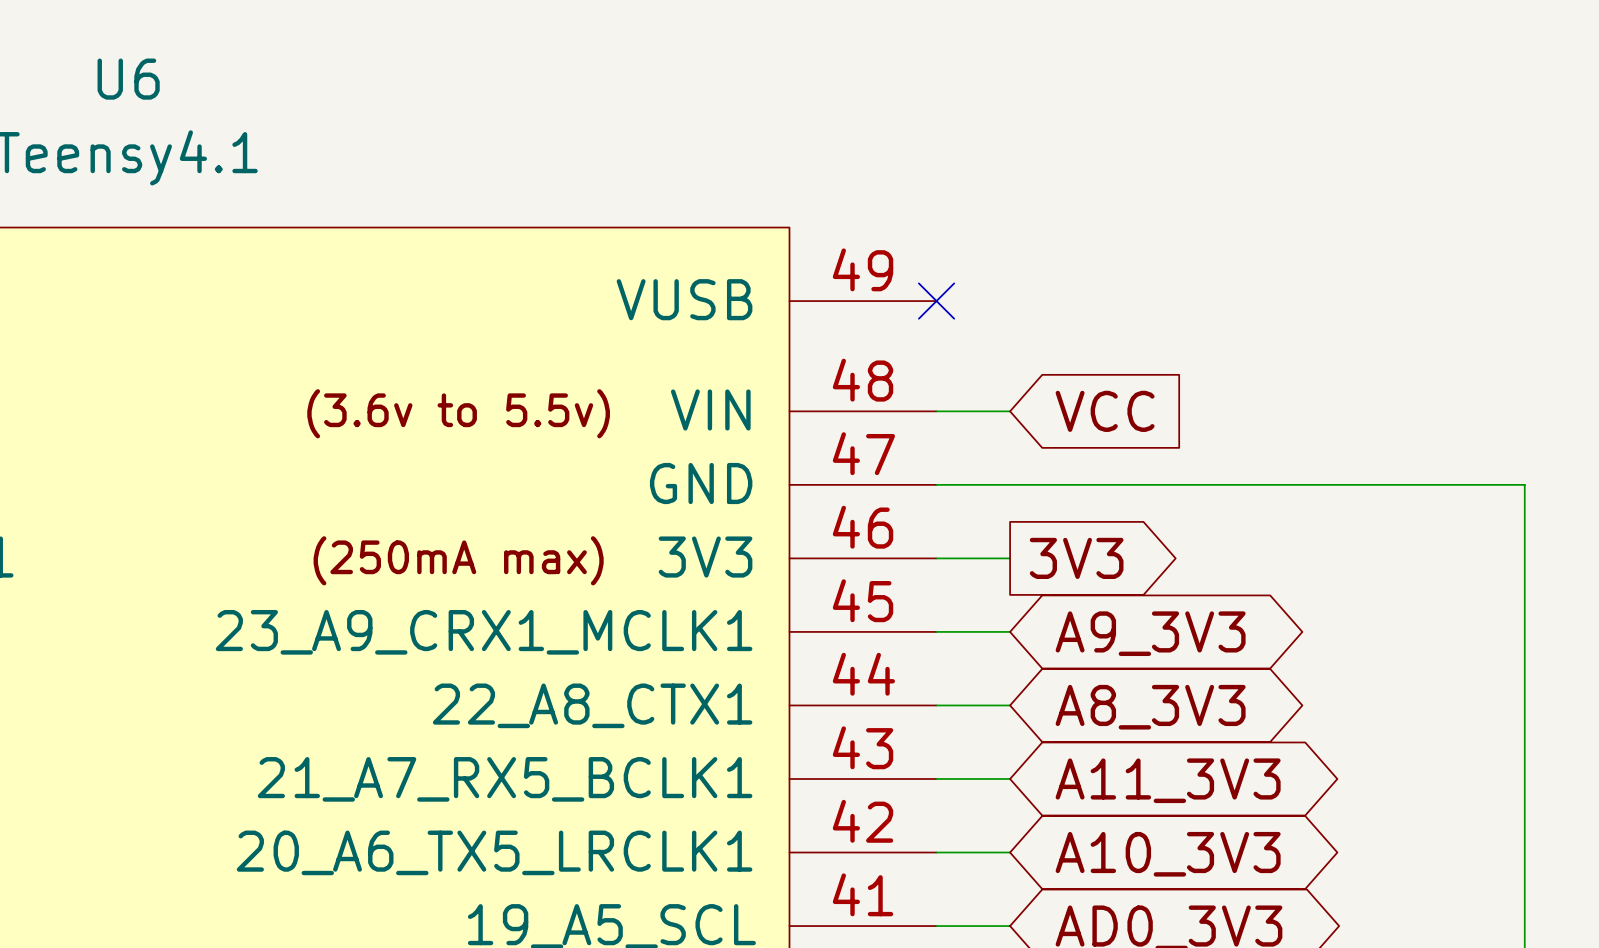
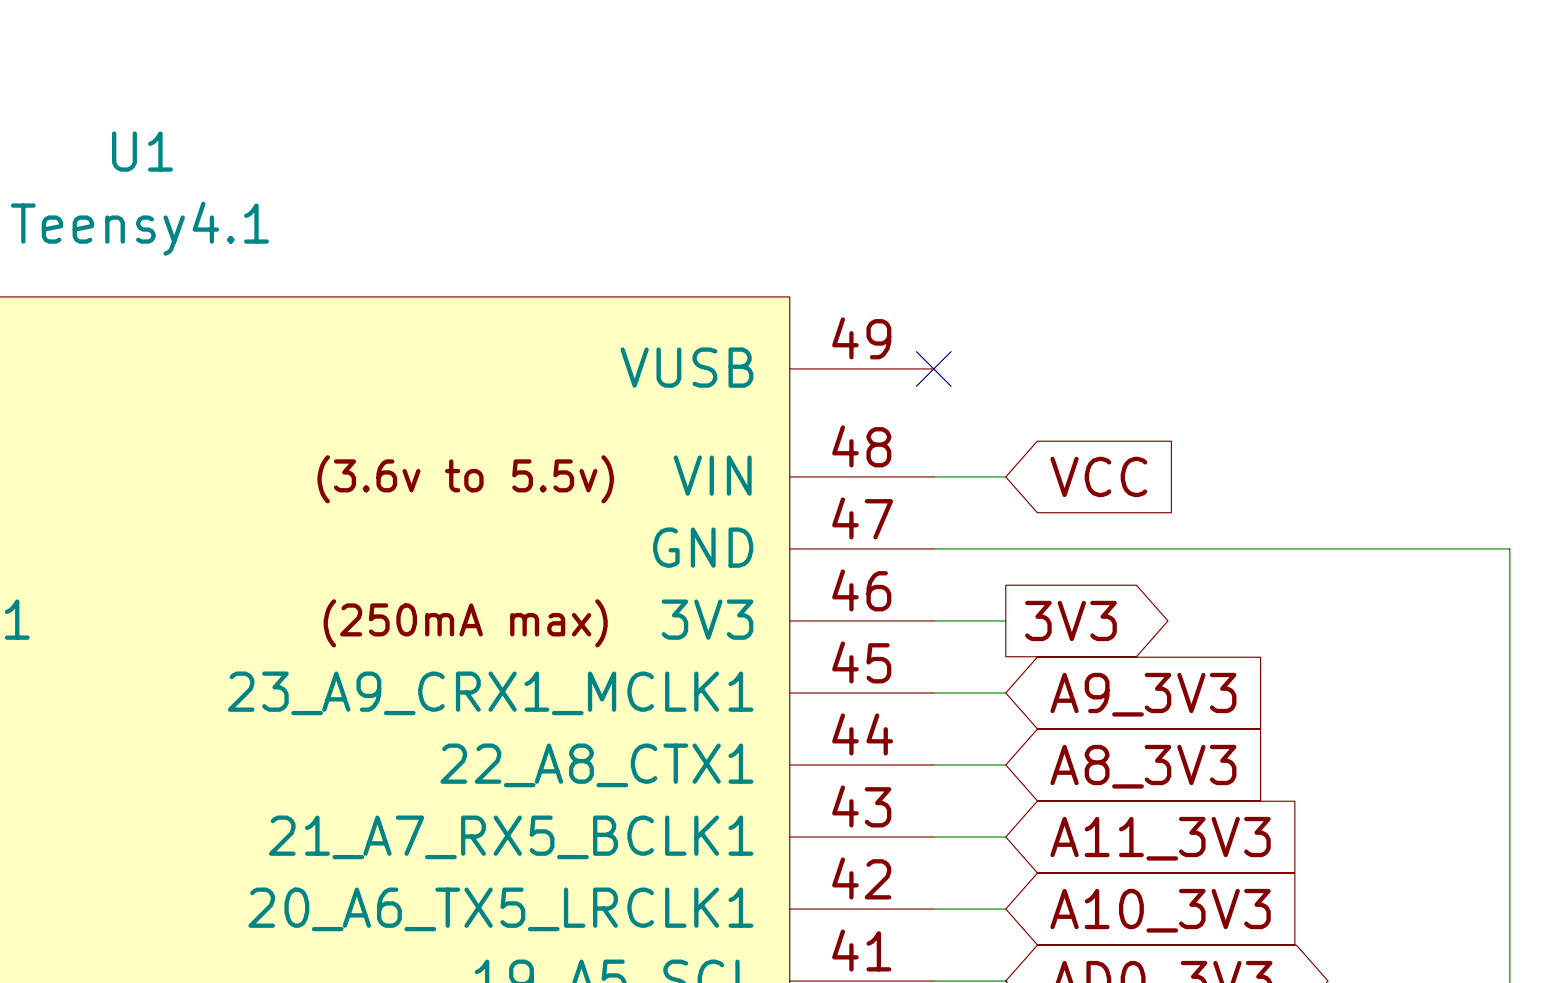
U6 name: U6 (128, 79) -> U1 (142, 151)
global label shape: bidirectional (1150, 633) -> input (1143, 694)
global label shape: bidirectional (1150, 707) -> input (1143, 766)
global label shape: bidirectional (1168, 780) -> input (1160, 838)
global label shape: bidirectional (1168, 854) -> input (1160, 910)

